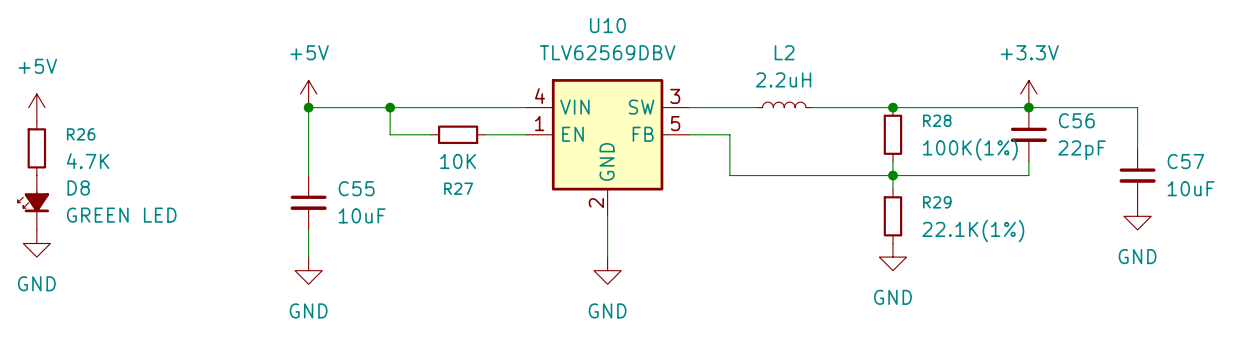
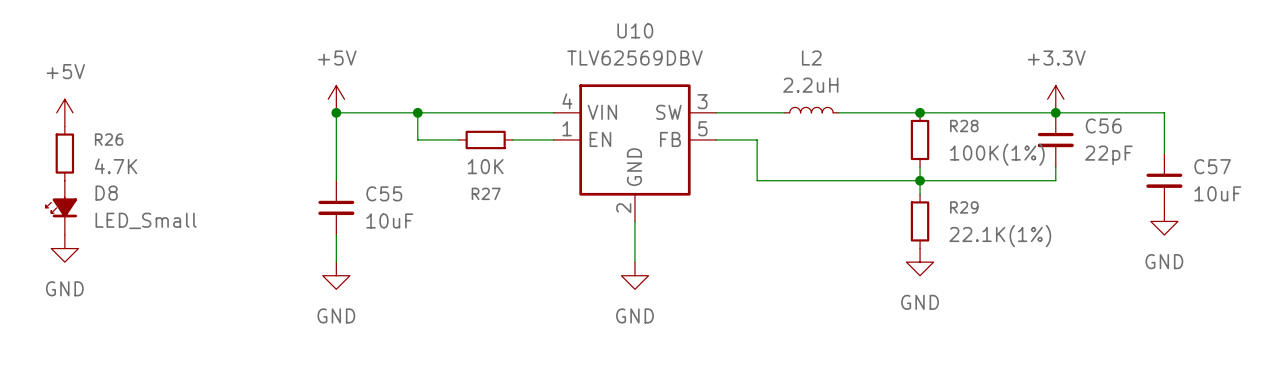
D8 value: GREEN LED (121, 215) -> LED_Small (146, 220)

